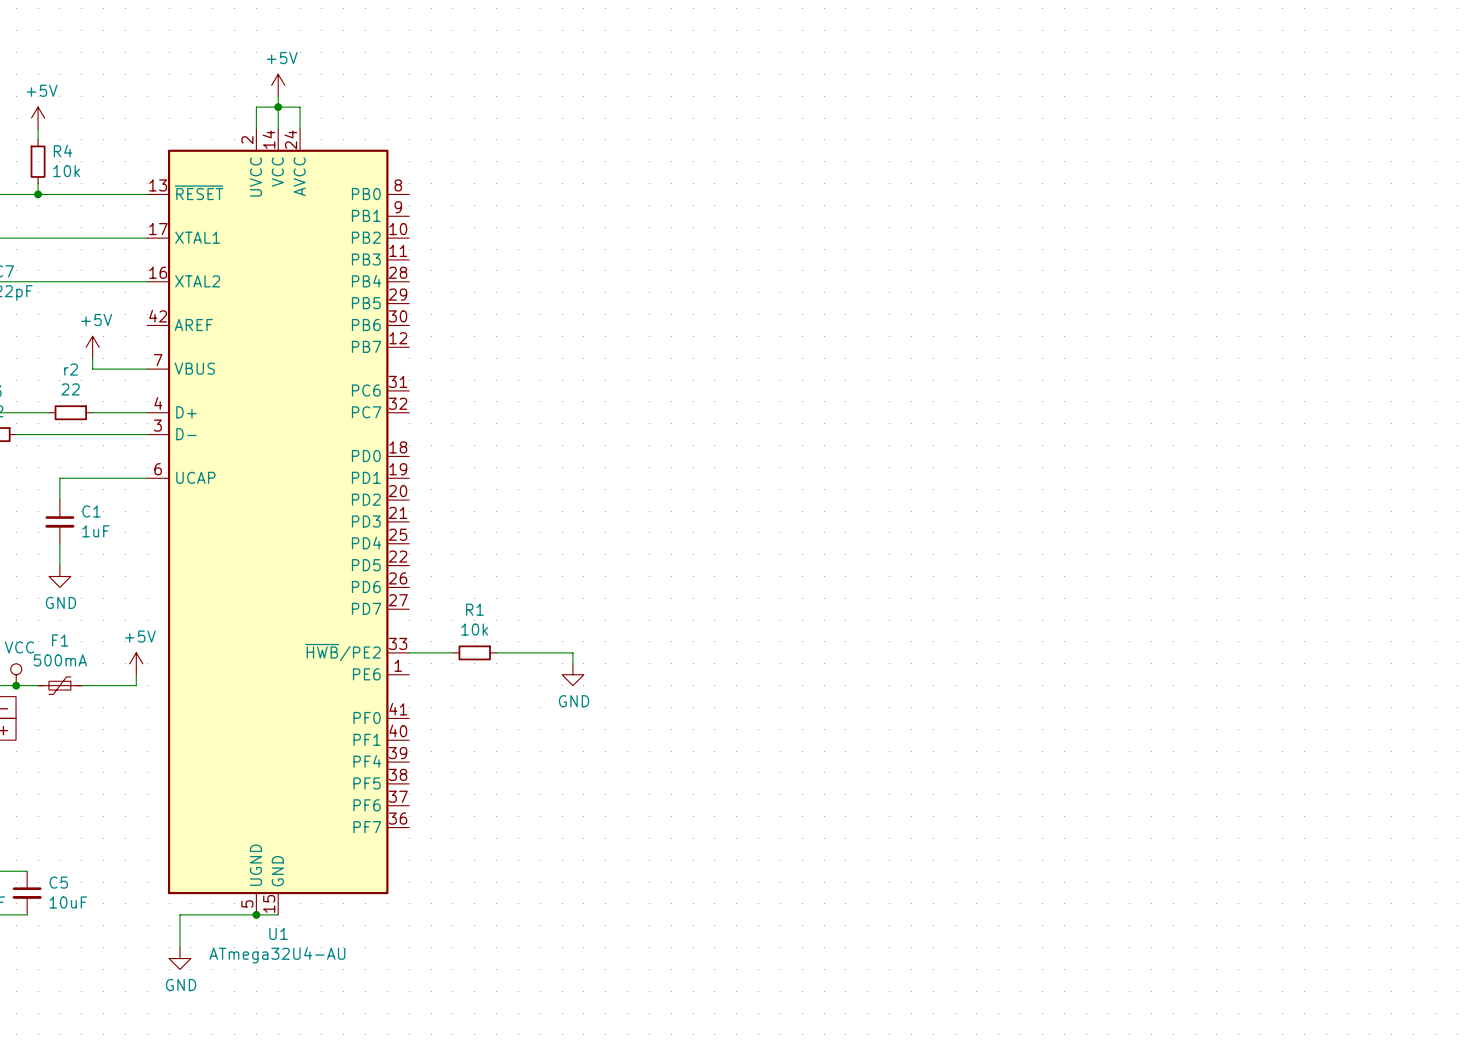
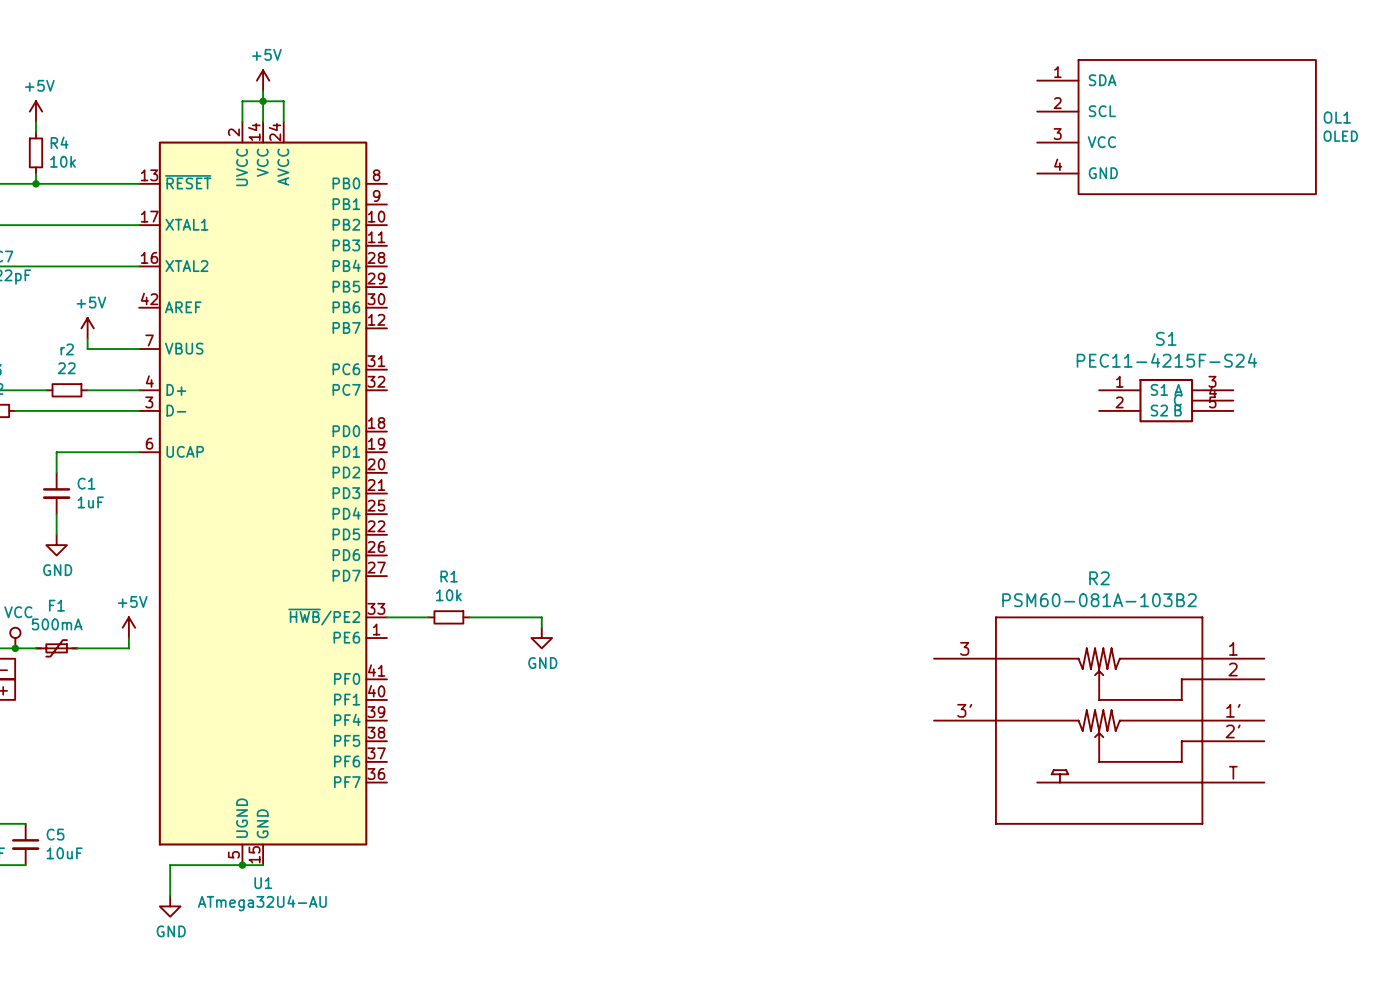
OL1: none -> OLED (1176, 127)
S1: none -> PEC11-4215F-S24 (1166, 400)
R2: none -> PSM60-081A-103B2 (1099, 720)

